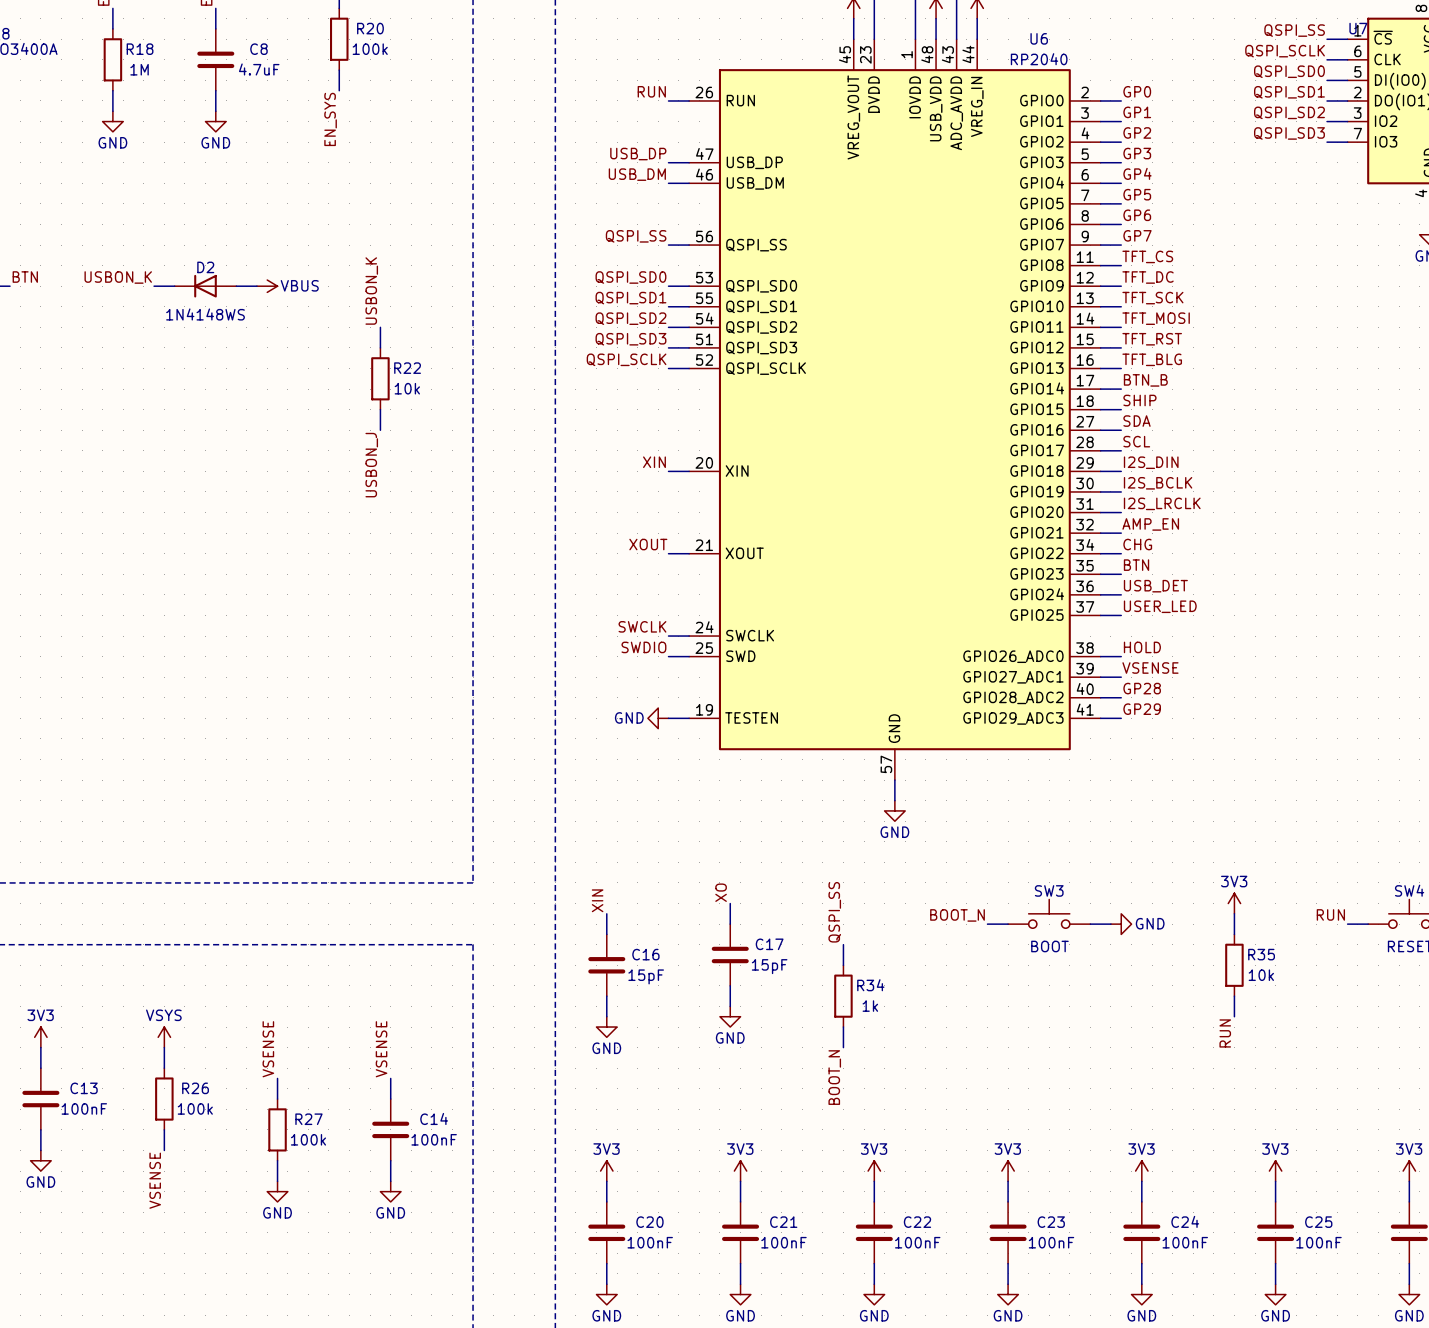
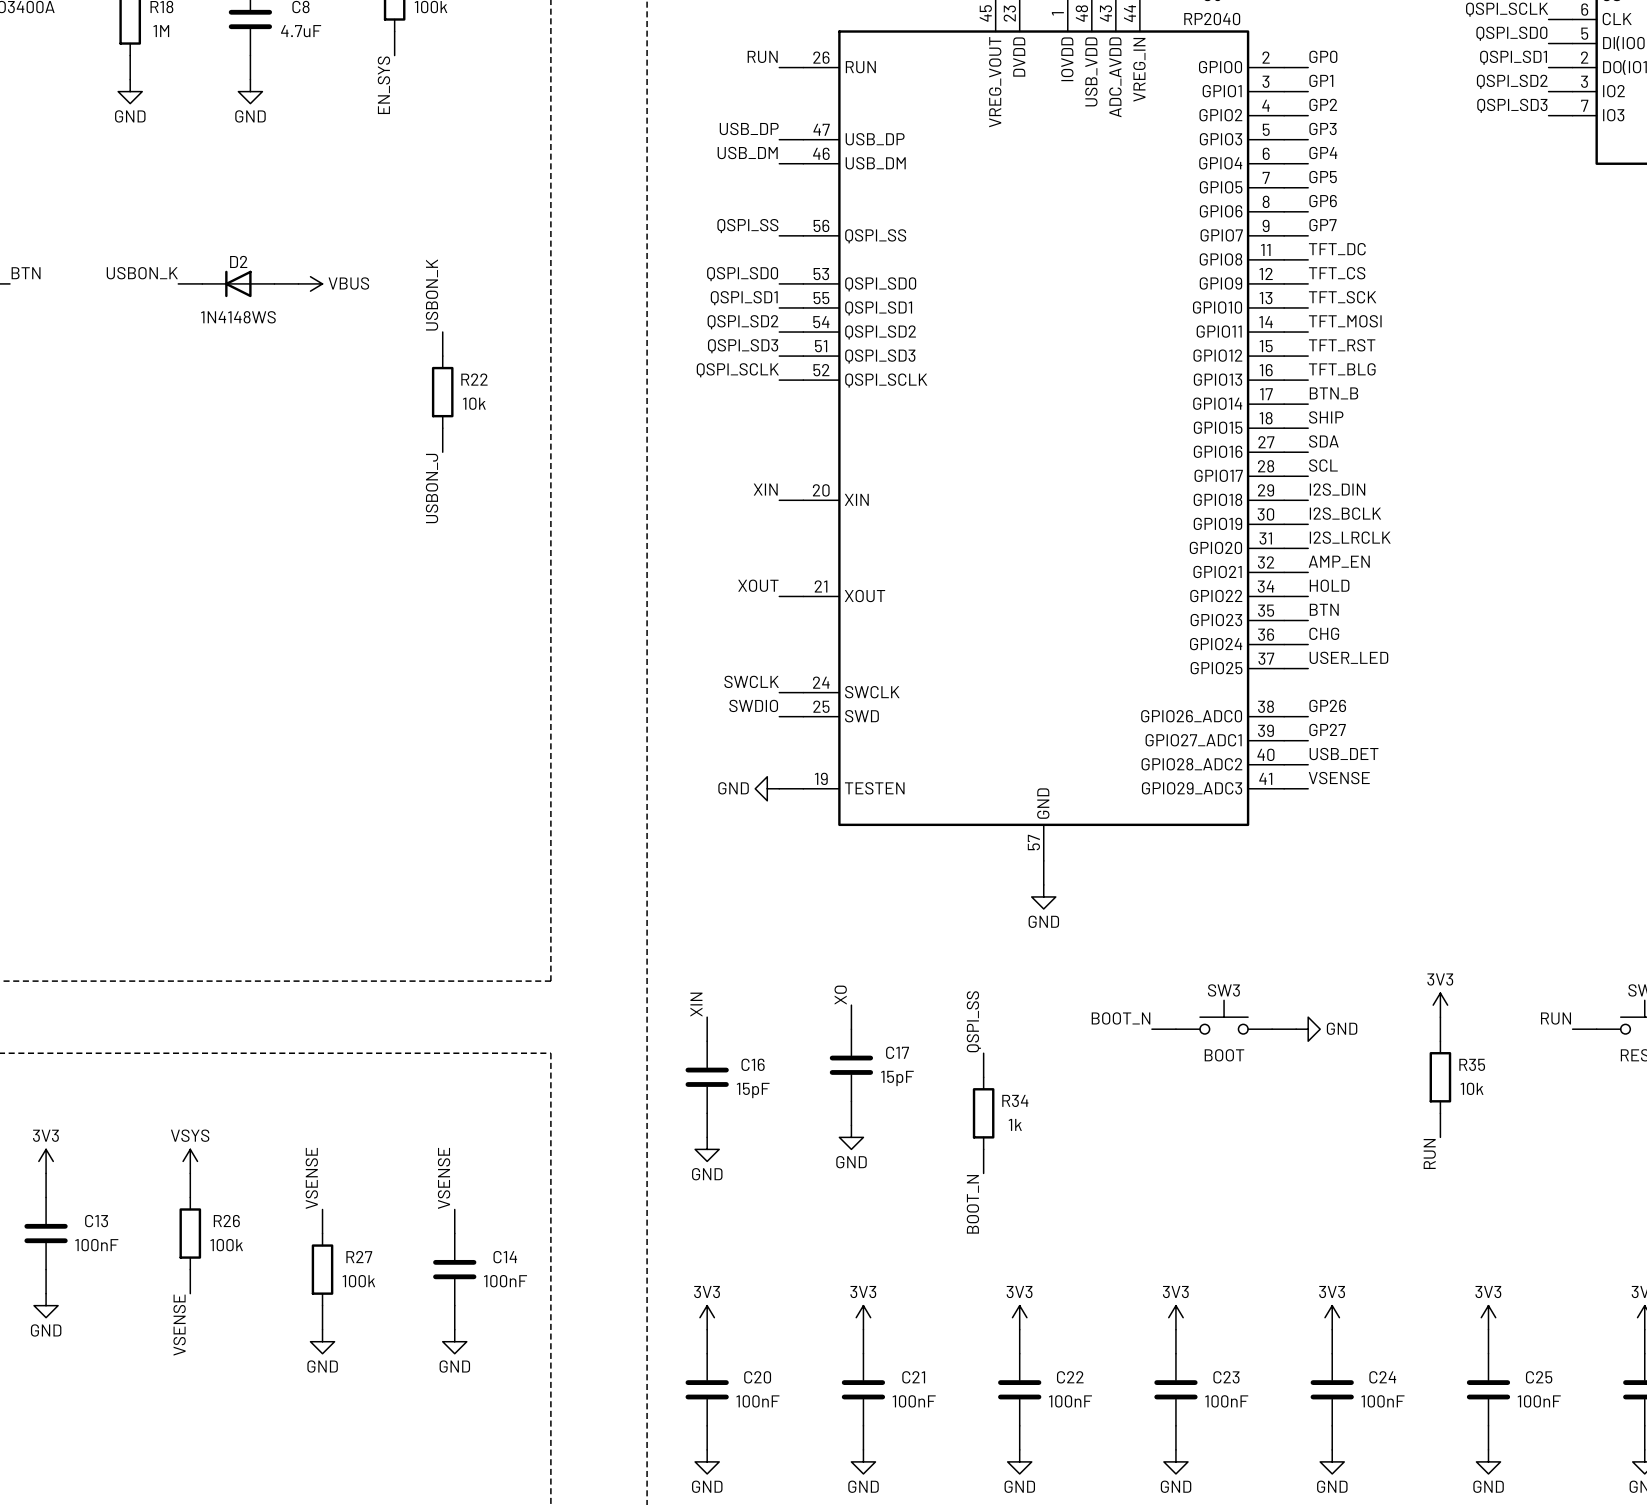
label: TFT_CS (1147, 256) -> TFT_DC (1337, 249)
label: TFT_DC (1148, 277) -> TFT_CS (1337, 273)
label: CHG (1137, 544) -> HOLD (1329, 585)
label: USB_DET (1155, 586) -> CHG (1324, 633)
label: HOLD (1142, 647) -> GP26 (1327, 705)
label: VSENSE (1150, 668) -> GP27 (1327, 729)
label: GP28 (1142, 688) -> USB_DET (1344, 754)
label: GP29 (1142, 709) -> VSENSE (1339, 778)

